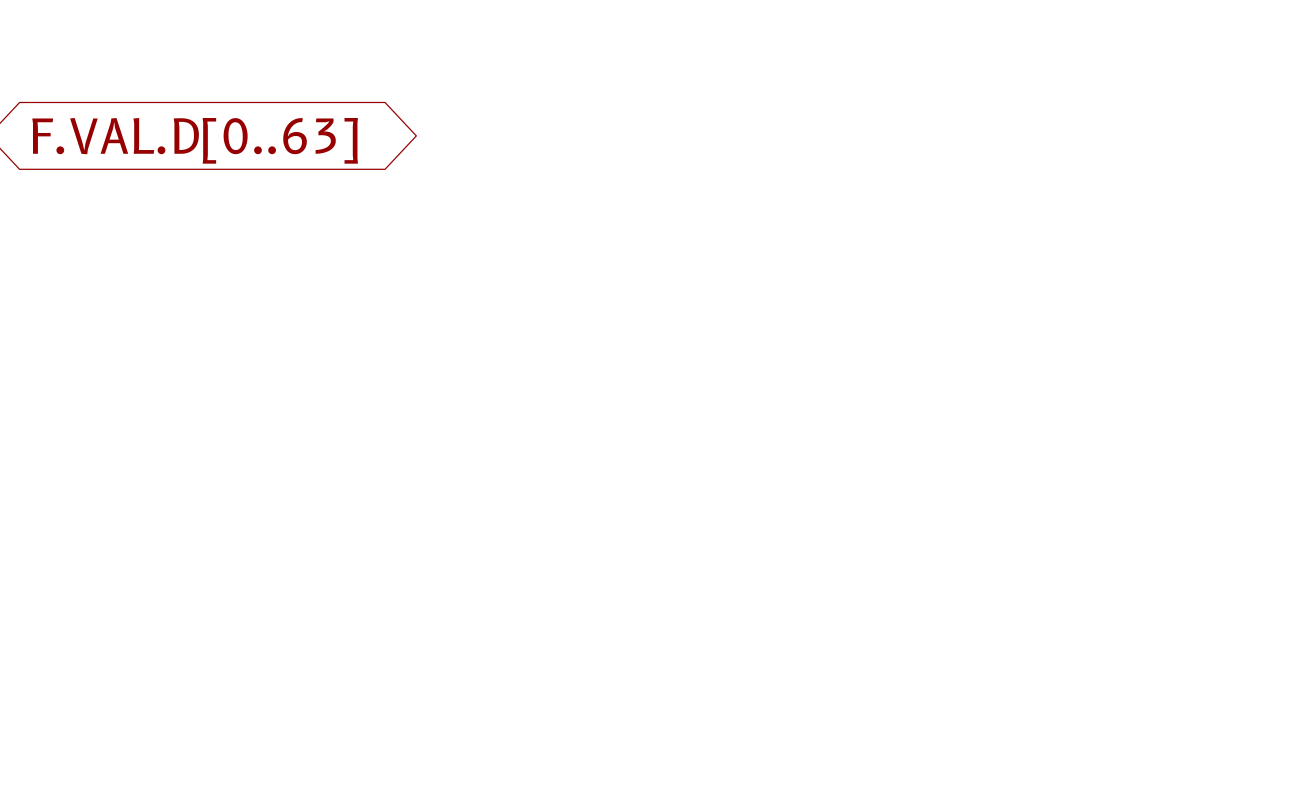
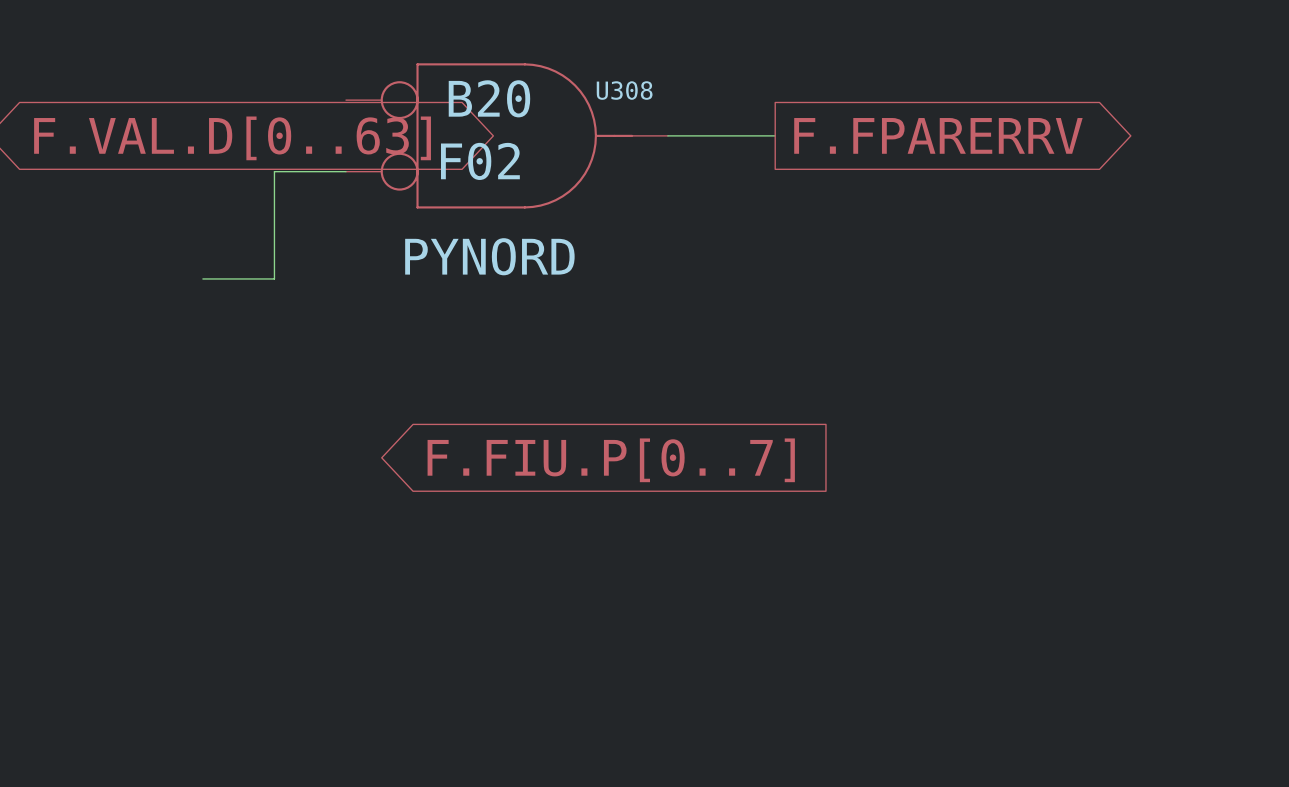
U308: none -> F02 (506, 135)
wire: none -> (667, 135) (775, 135)
global label: none -> F.FPARERRV (938, 135)
wire: none -> (345, 171) (274, 171) (274, 278) (202, 278)
global label: none -> F.FIU.P[0..7] (611, 460)

